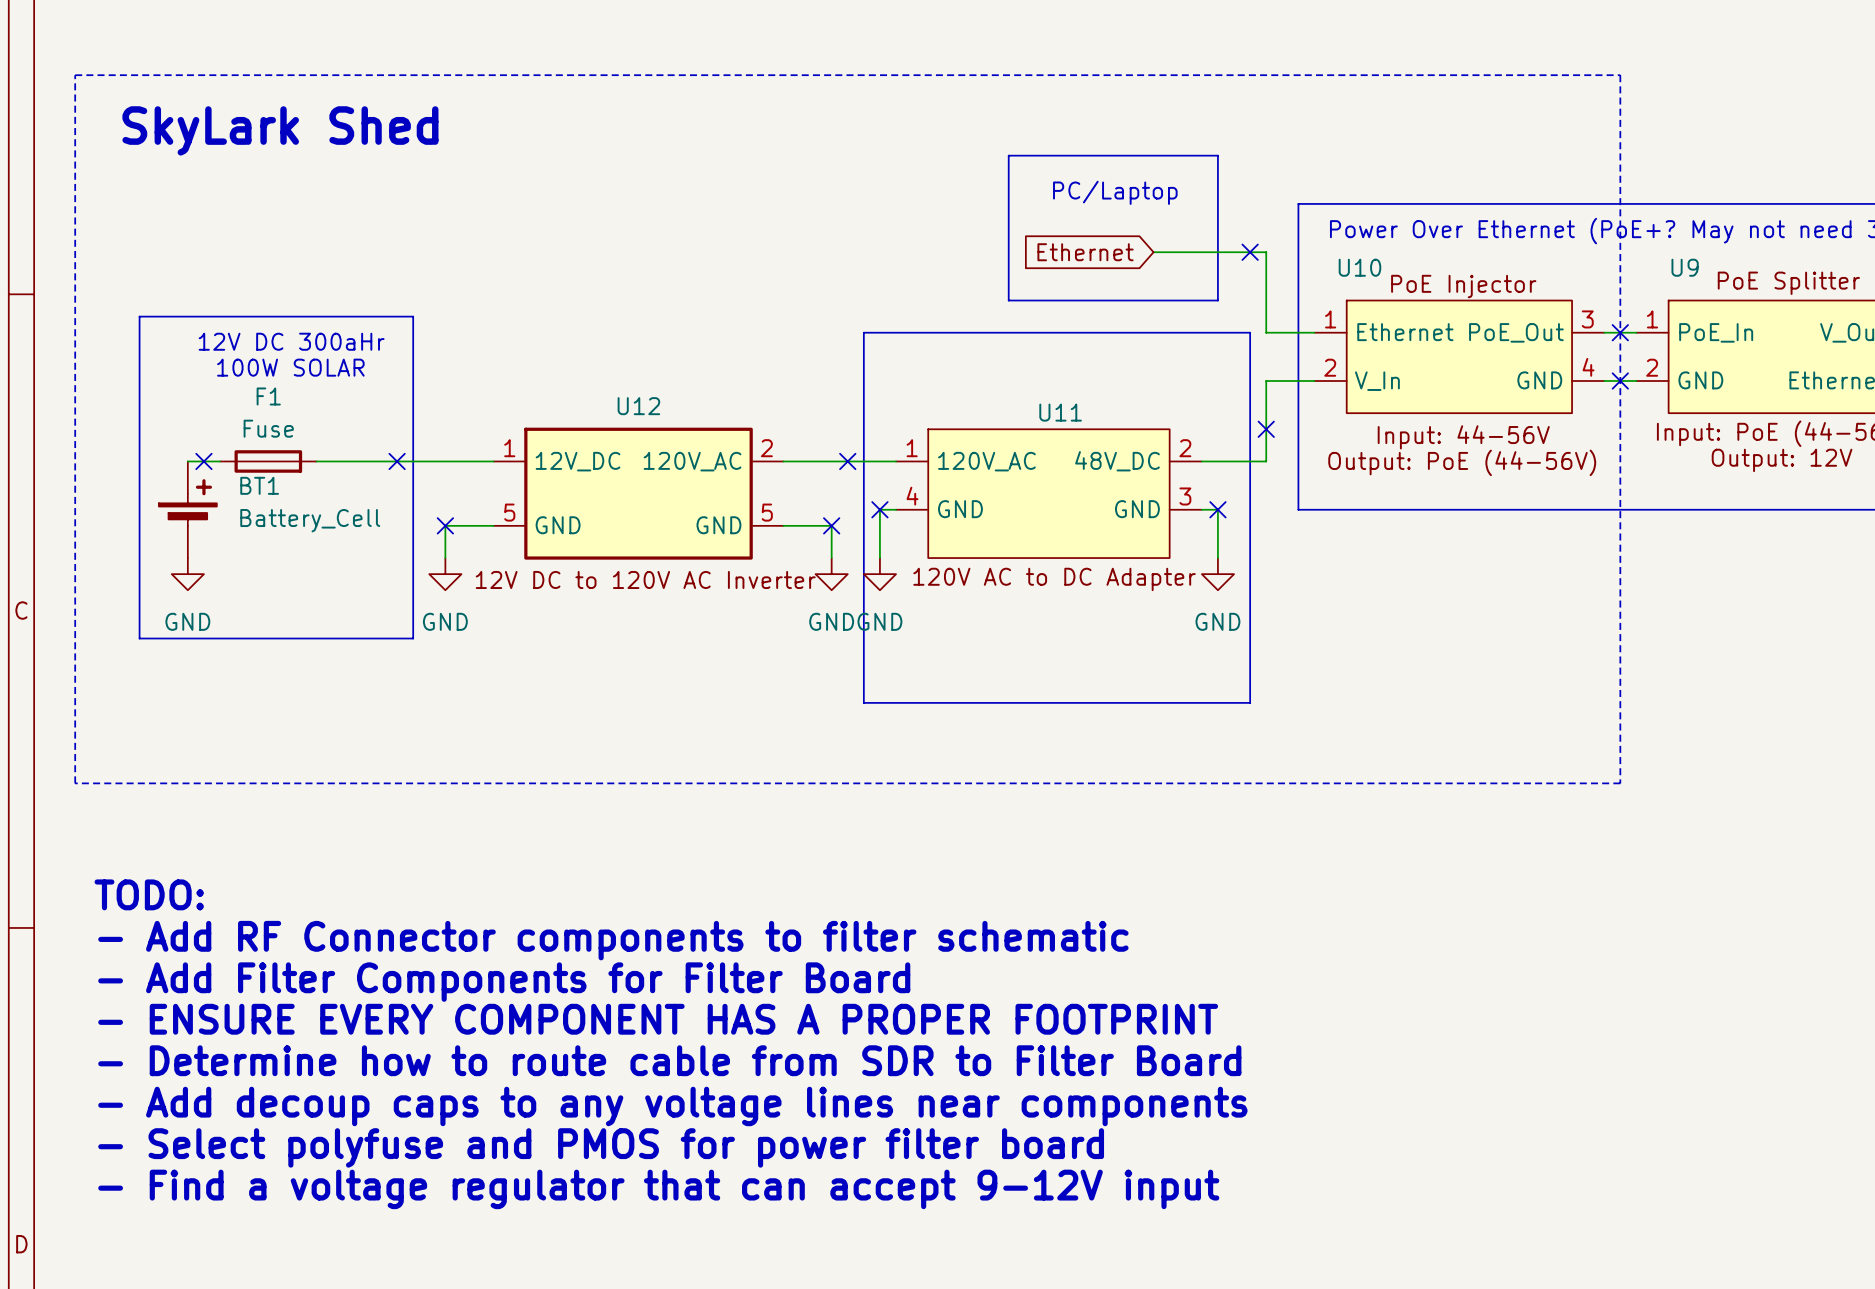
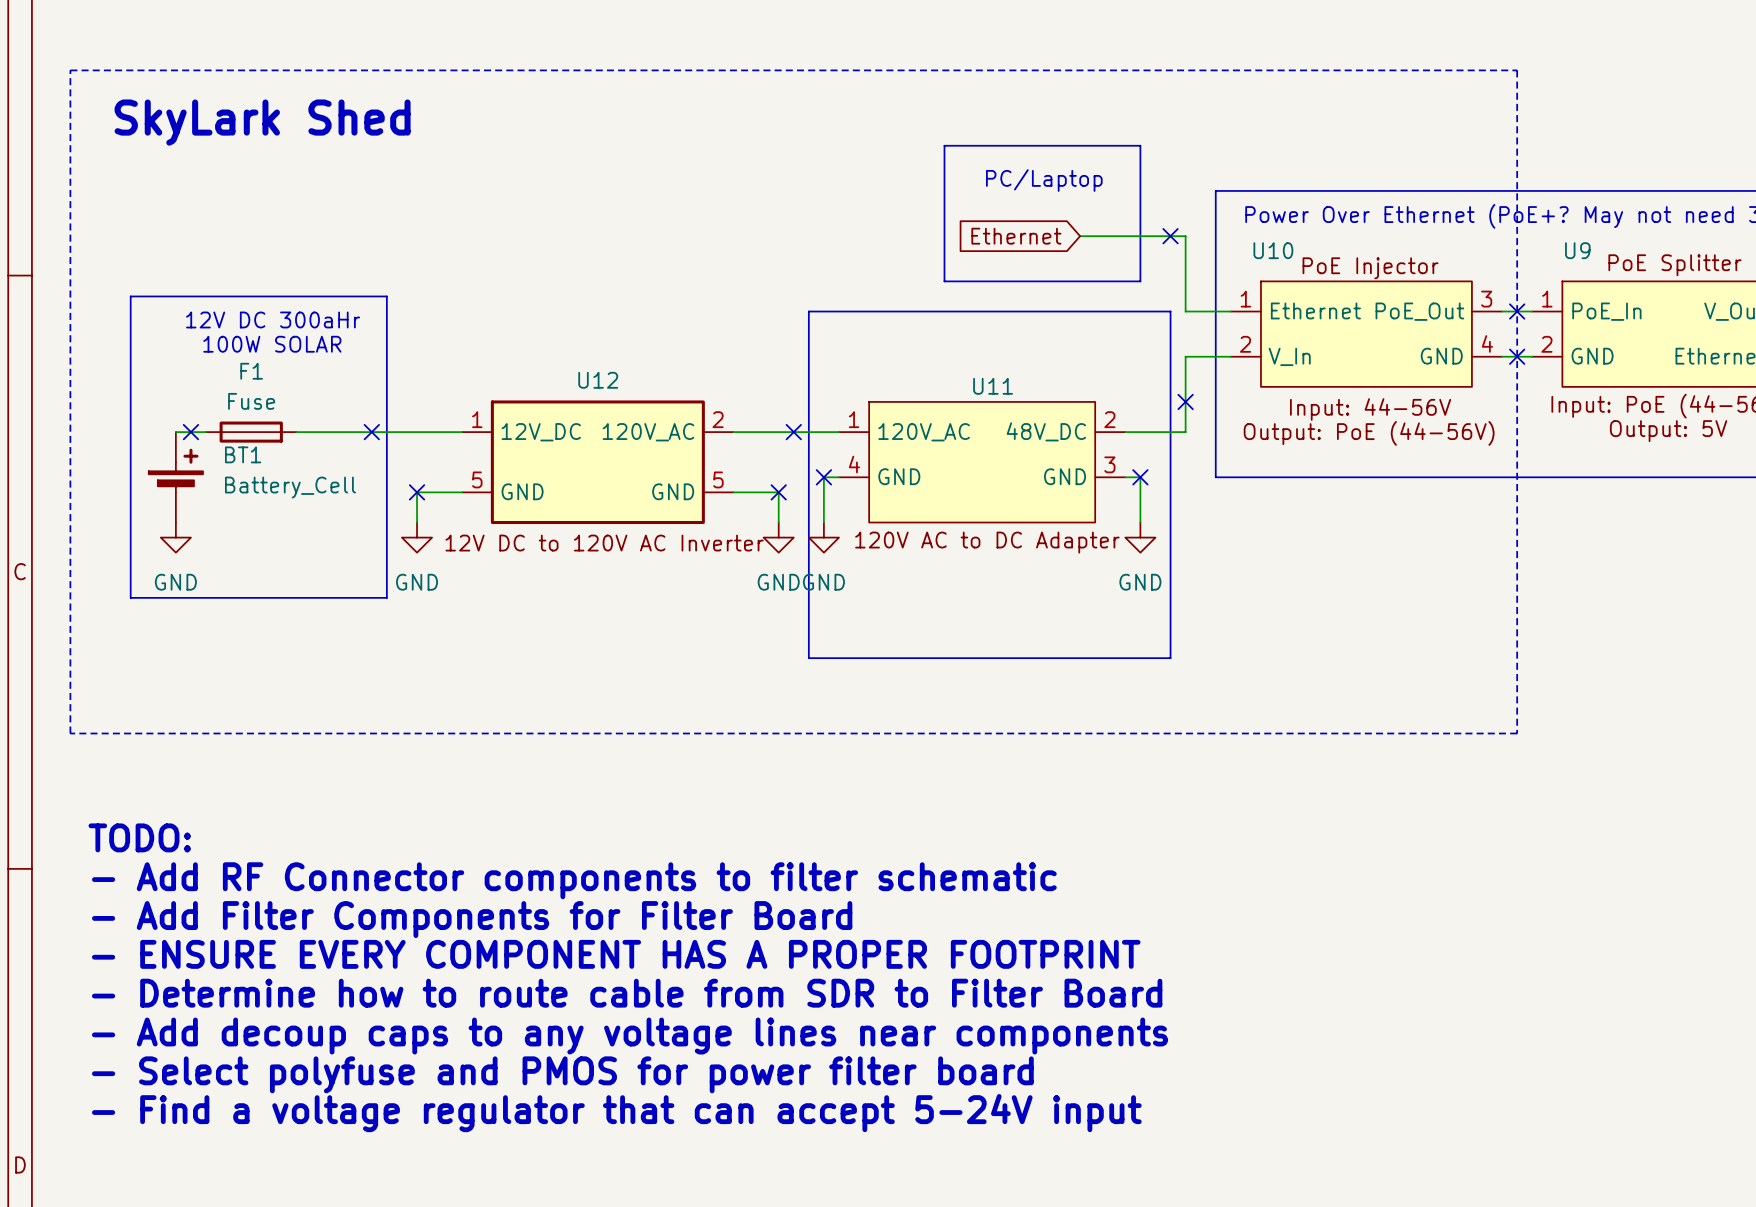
U9 text: Output: 12V (1782, 460) -> Output: 5V (1668, 431)
text: - Find a voltage regulator that can accept 9-12V input (658, 1189) -> - Find a voltage regulator that can accept 5-24V input (616, 1113)

